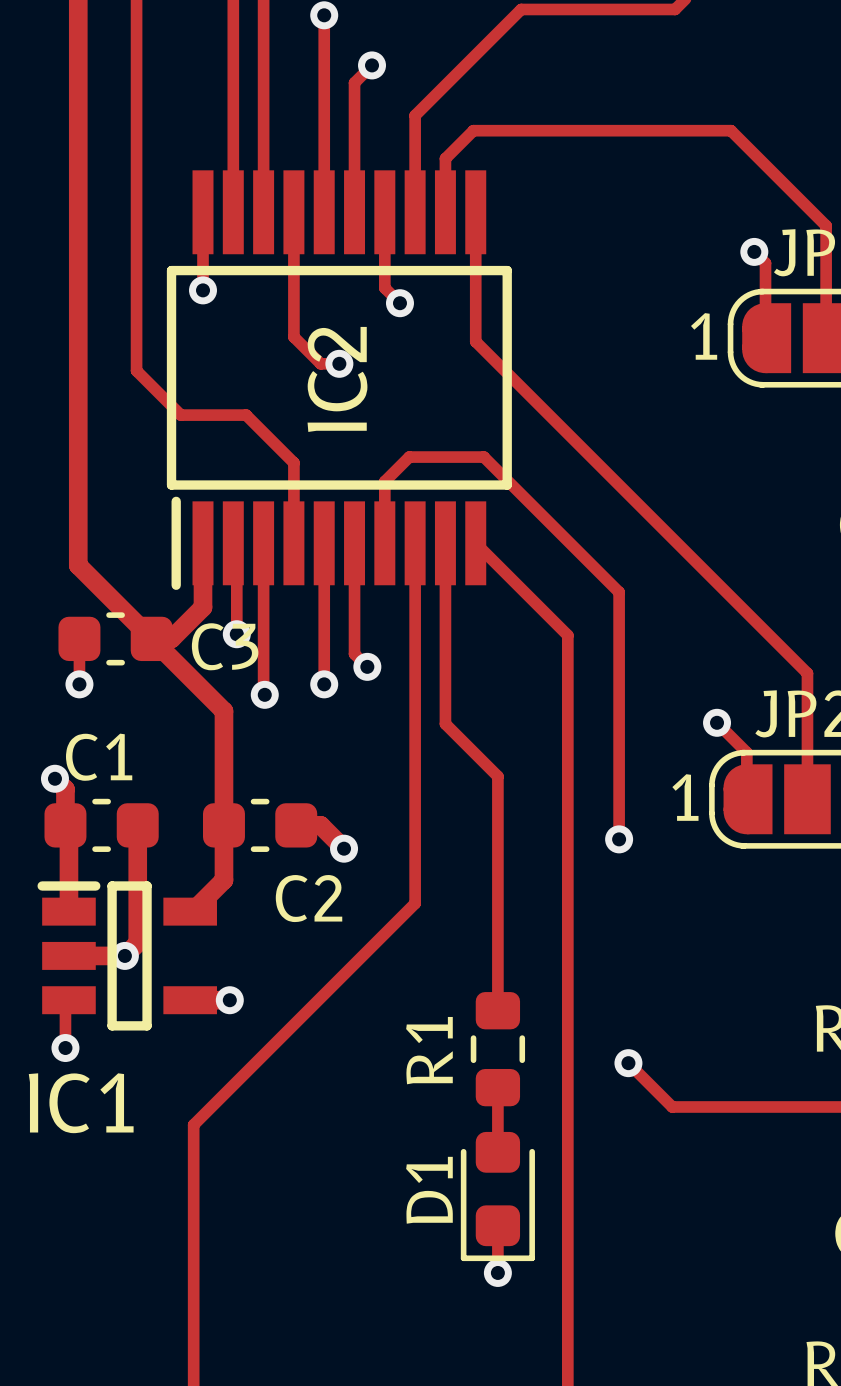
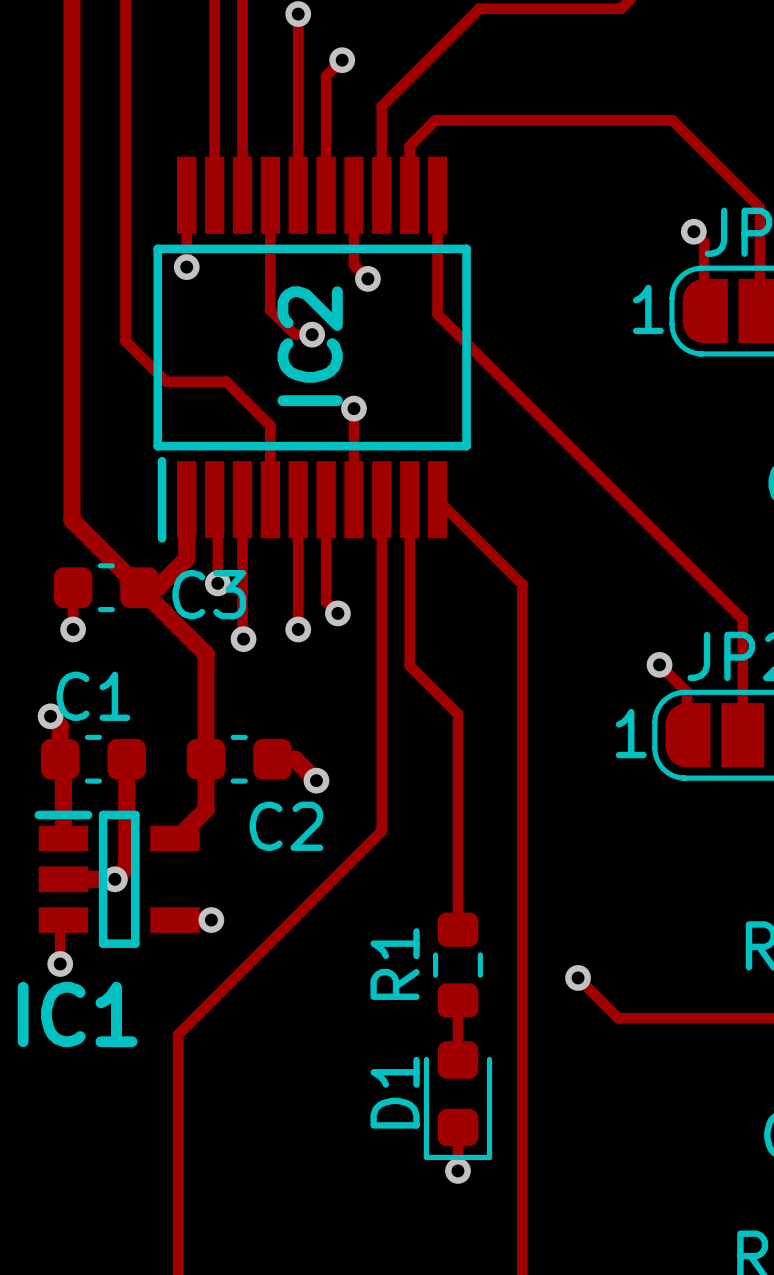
via: none -> (353, 408)
track: (384, 481) (409, 457) (483, 457) (619, 592) (619, 839) -> (353, 442) (353, 408)
via: (619, 839) -> none

